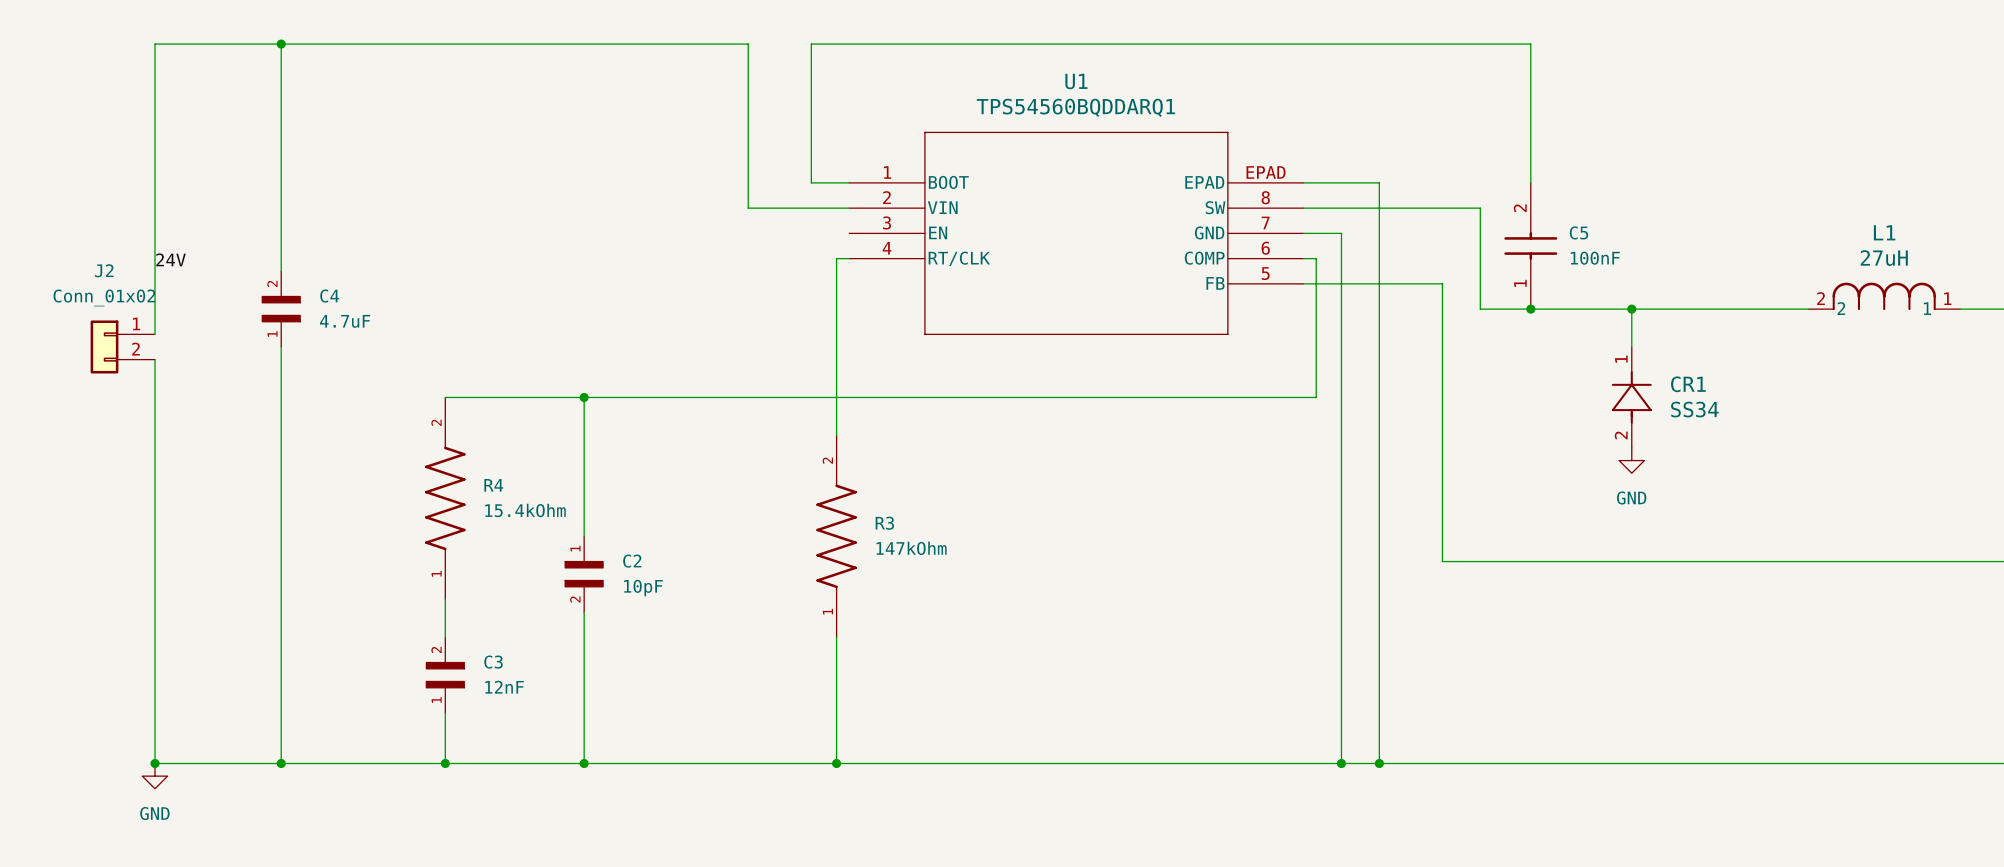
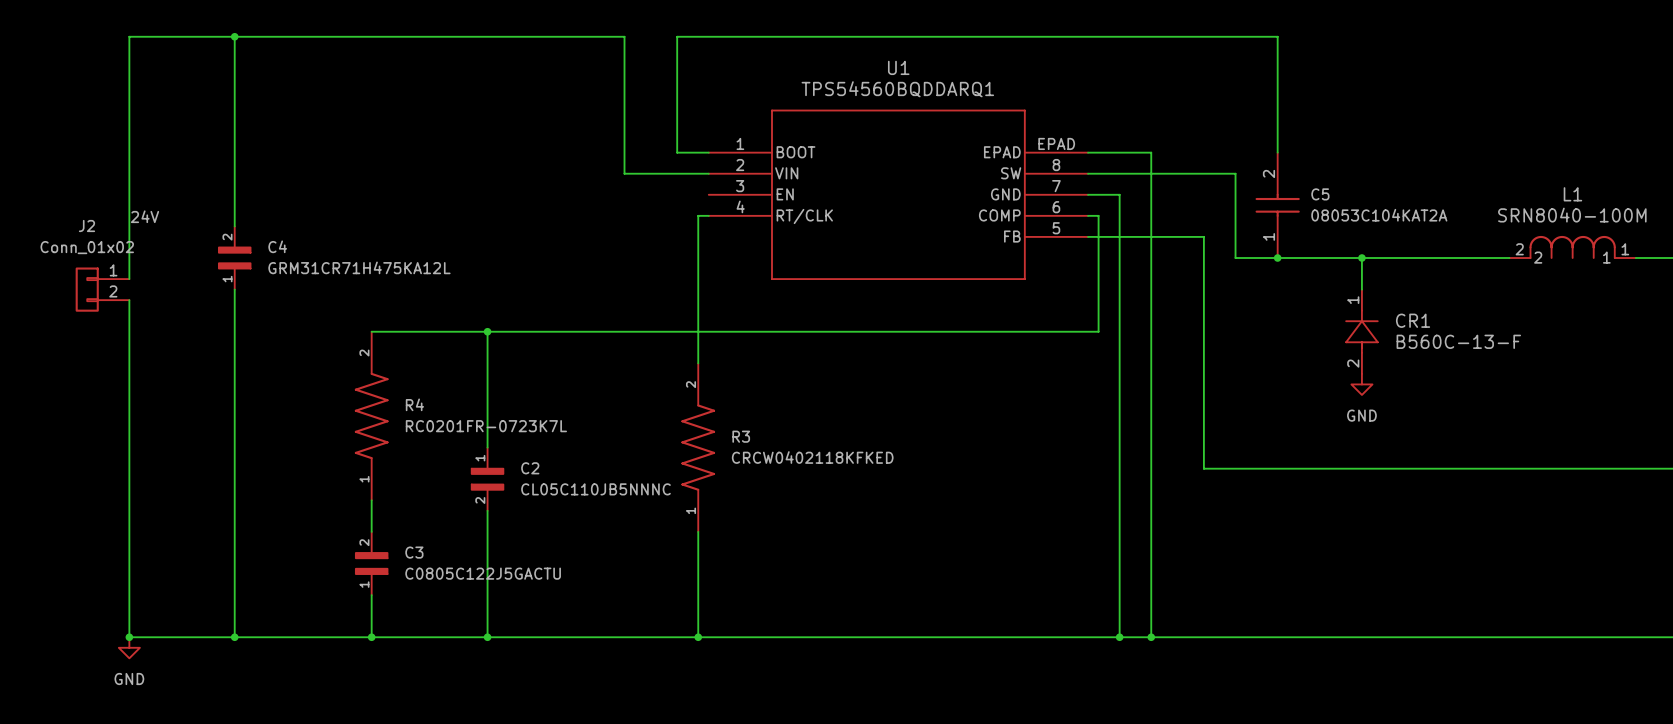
C5 value: 100nF (1595, 258) -> 08053C104KAT2A (1379, 215)
L1 value: 27uH (1884, 258) -> SRN8040-100M (1572, 215)
C4 value: 4.7uF (345, 321) -> GRM31CR71H475KA12L (359, 267)
CR1 value: SS34 (1694, 409) -> B560C-13-F (1458, 341)
R4 value: 15.4kOhm (525, 510) -> RC0201FR-0723K7L (486, 426)
R3 value: 147kOhm (911, 548) -> CRCW0402118KFKED (812, 457)
C2 value: 10pF (643, 588) -> CL05C110JB5NNNC (595, 489)
C3 value: 12nF (504, 687) -> C0805C122J5GACTU (483, 573)

